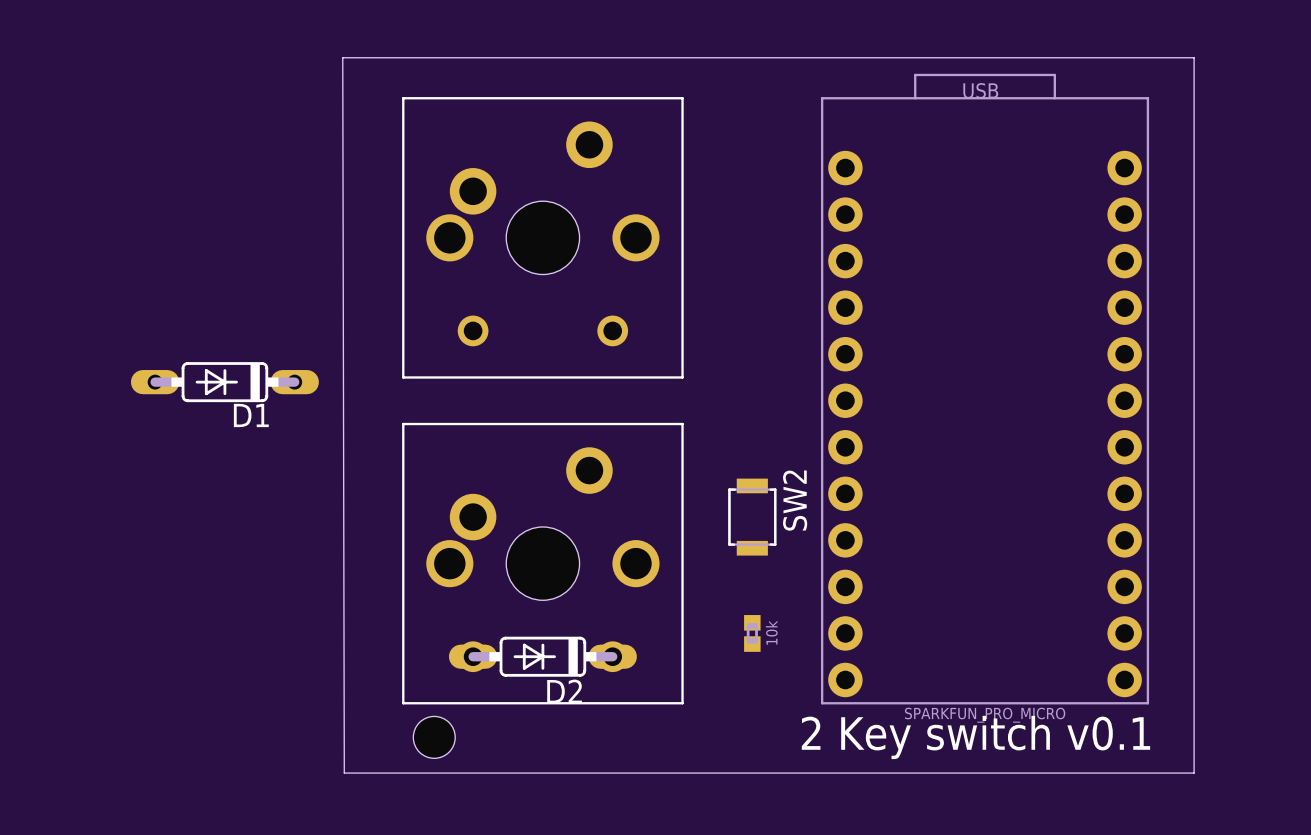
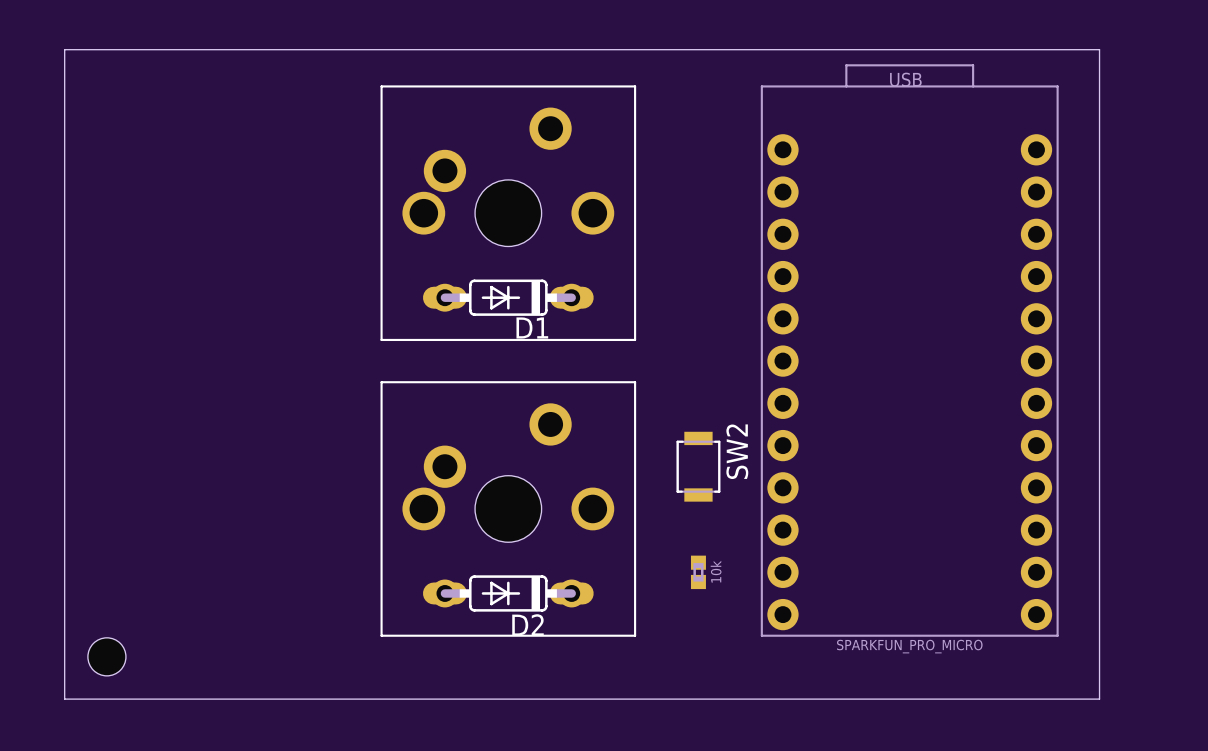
board edge: (342, 57) (344, 773) -> (326, 49) (64, 49) (64, 699) (328, 699)
D1 position: (224, 382) -> (508, 297)
hole position: (434, 737) -> (106, 656)
text: 2 Key switch v0.1 (975, 737) -> none

